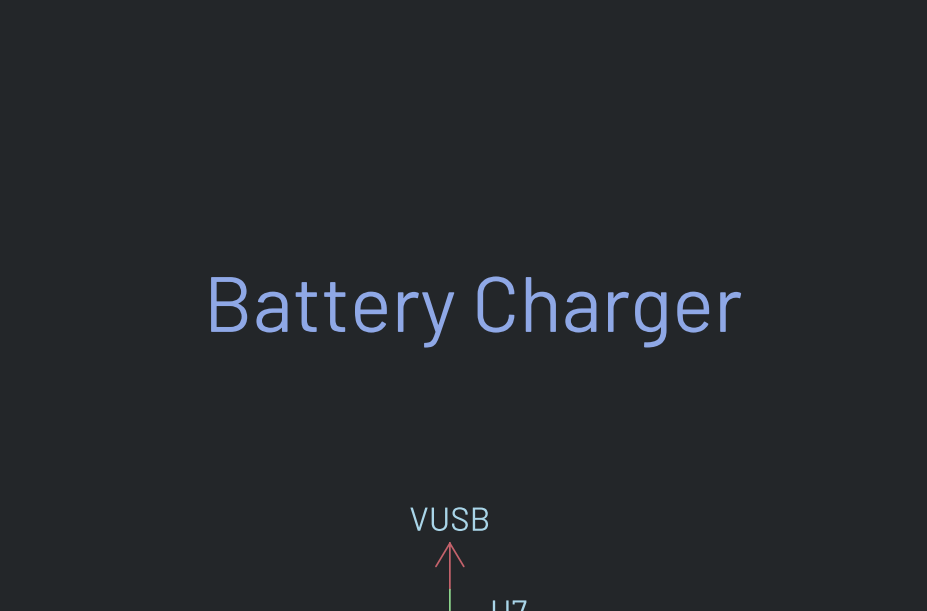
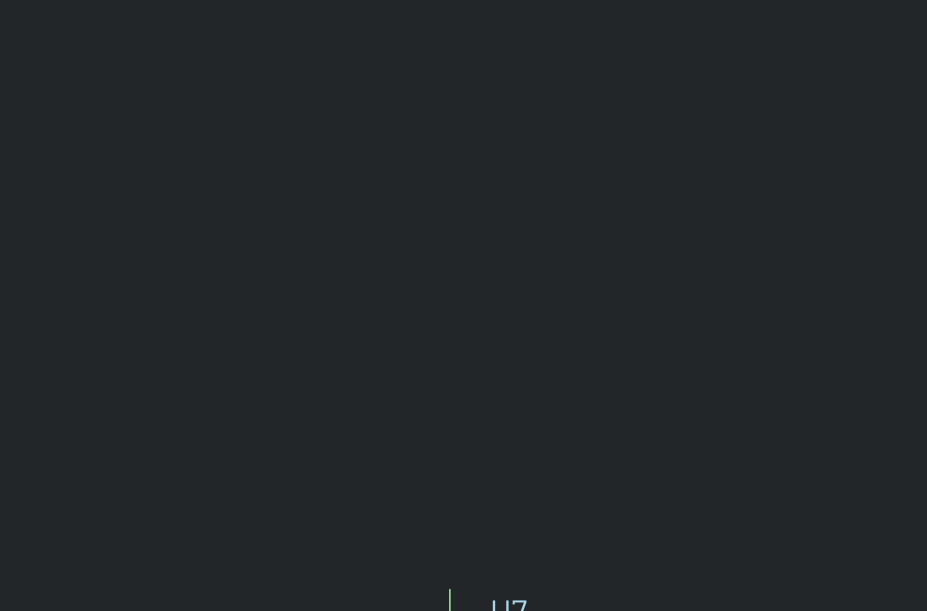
text: Battery Charger (476, 312) -> none
power symbol: VUSB (449, 566) -> none

